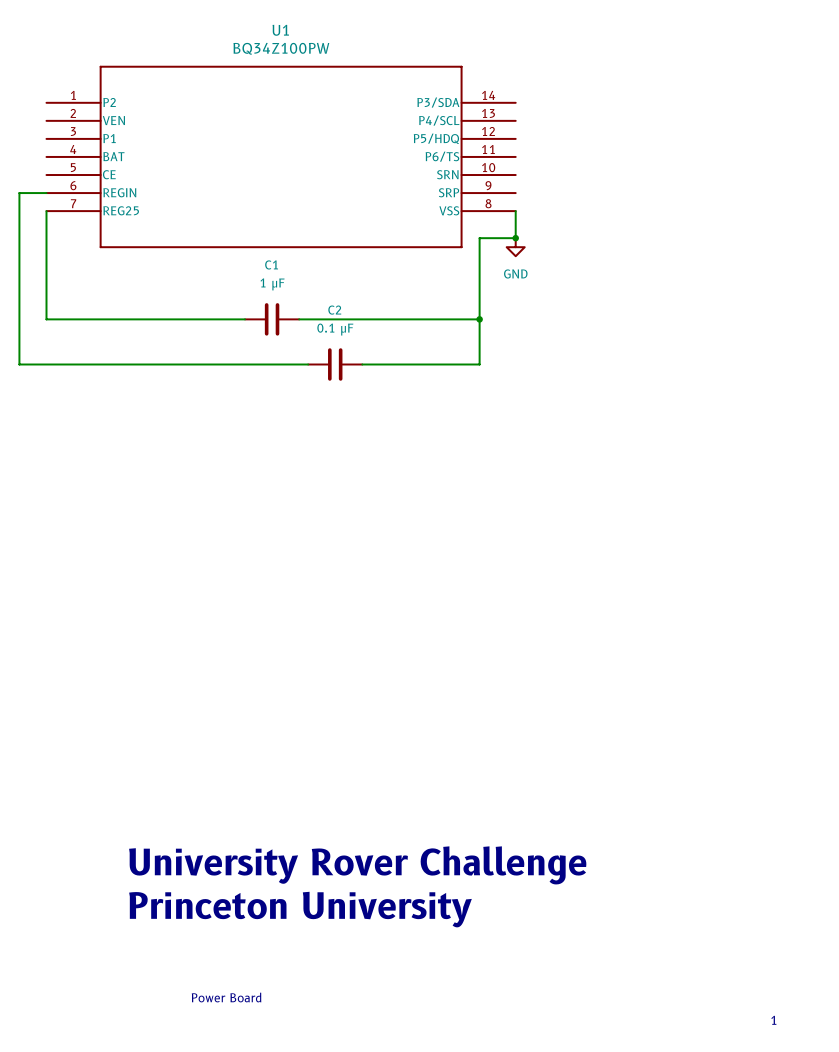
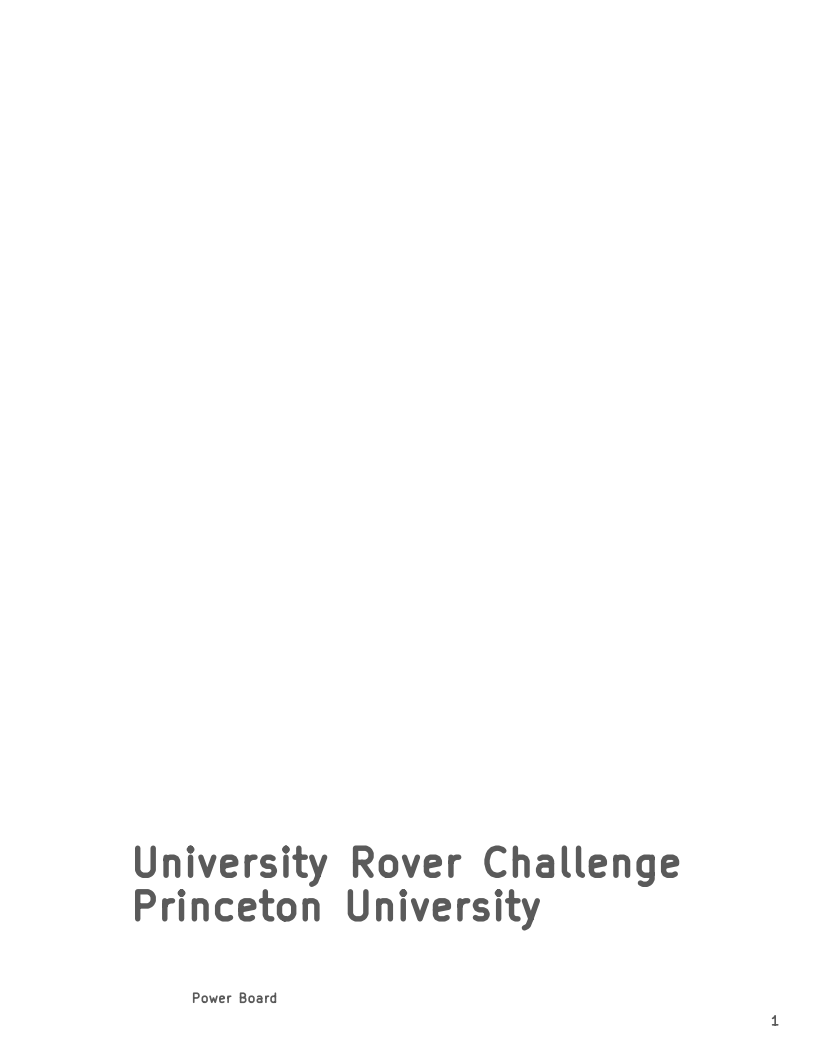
U1: BQ34Z100PW (281, 156) -> none
wire: (46, 193) (19, 193) (19, 364) (308, 364) -> none
wire: (46, 211) (46, 319) (245, 319) -> none
wire: (515, 211) (515, 238) (479, 238) (479, 364) (362, 364) -> none
junction: (515, 238) -> none
power symbol: GND (515, 247) -> none
C1: 1 μF (272, 319) -> none
wire: (299, 319) (479, 319) -> none
junction: (479, 319) -> none
C2: 0.1 μF (335, 364) -> none

